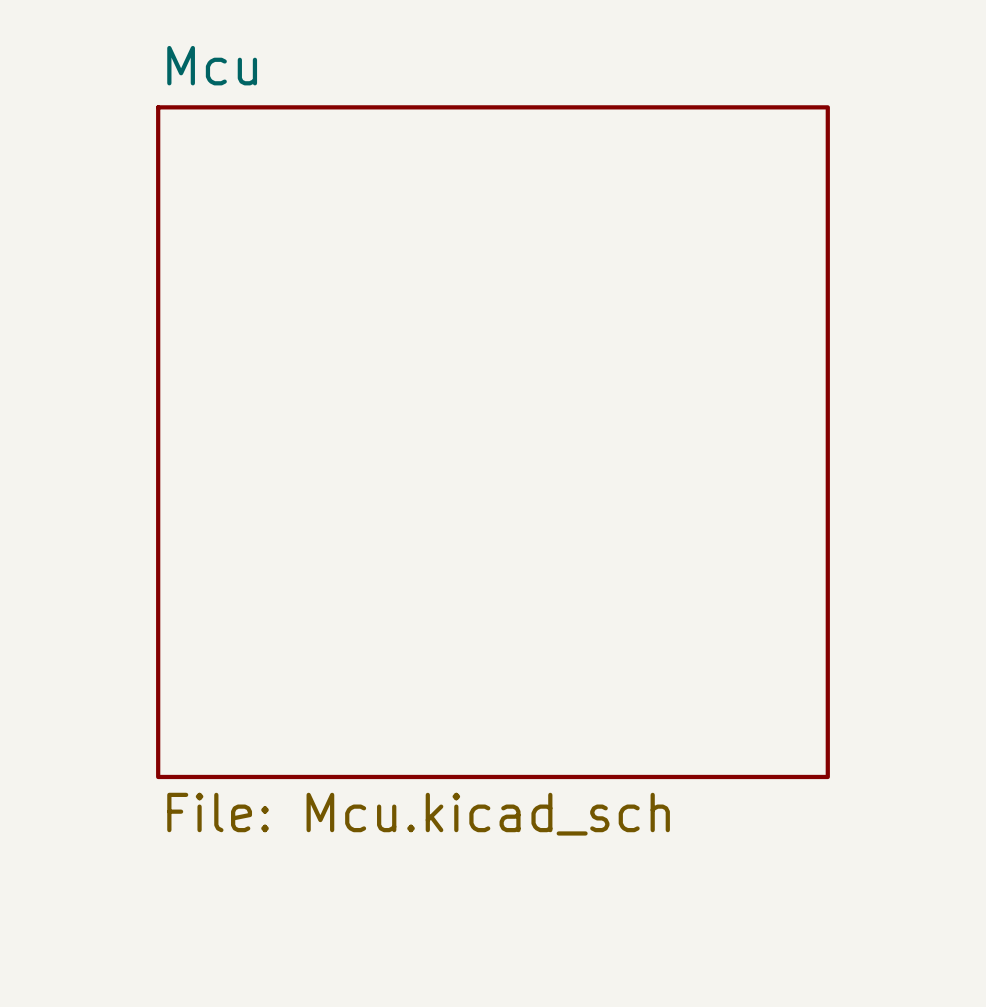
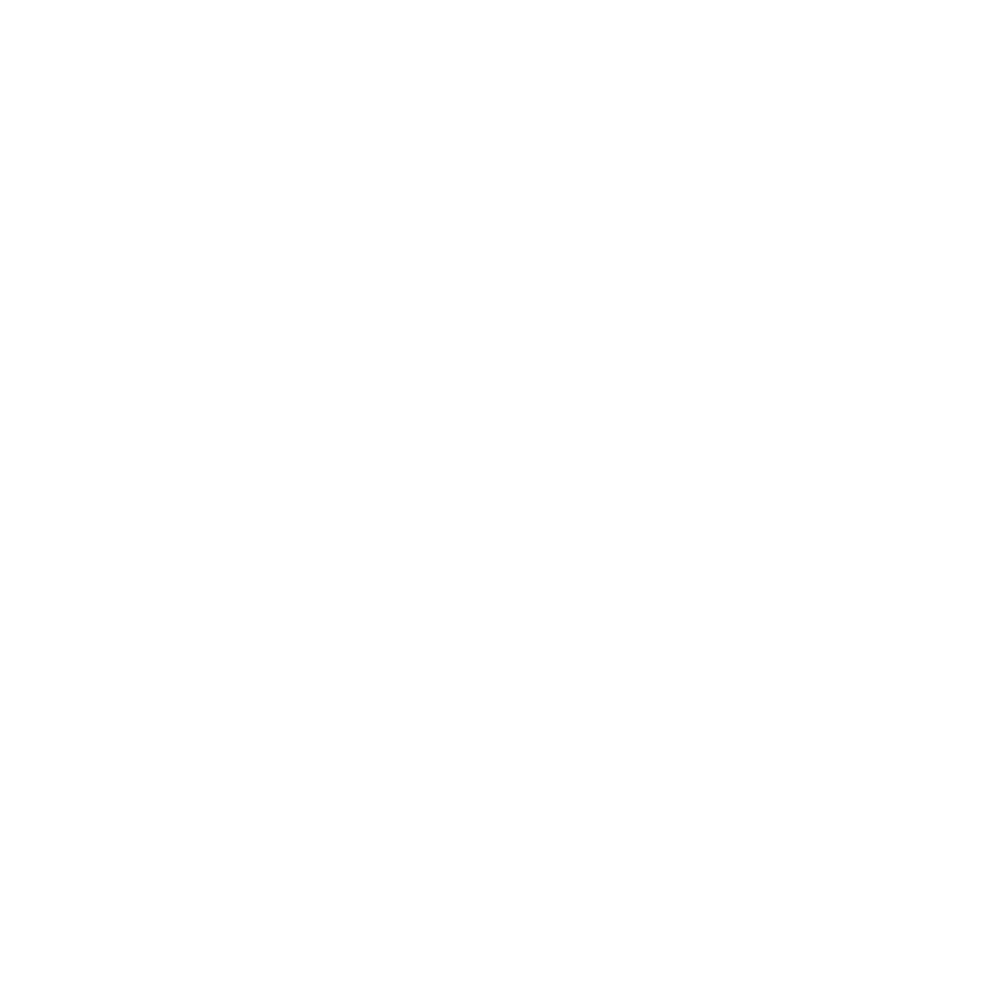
sheet Mcu: File: Mcu.kicad_sch (492, 442) -> none

